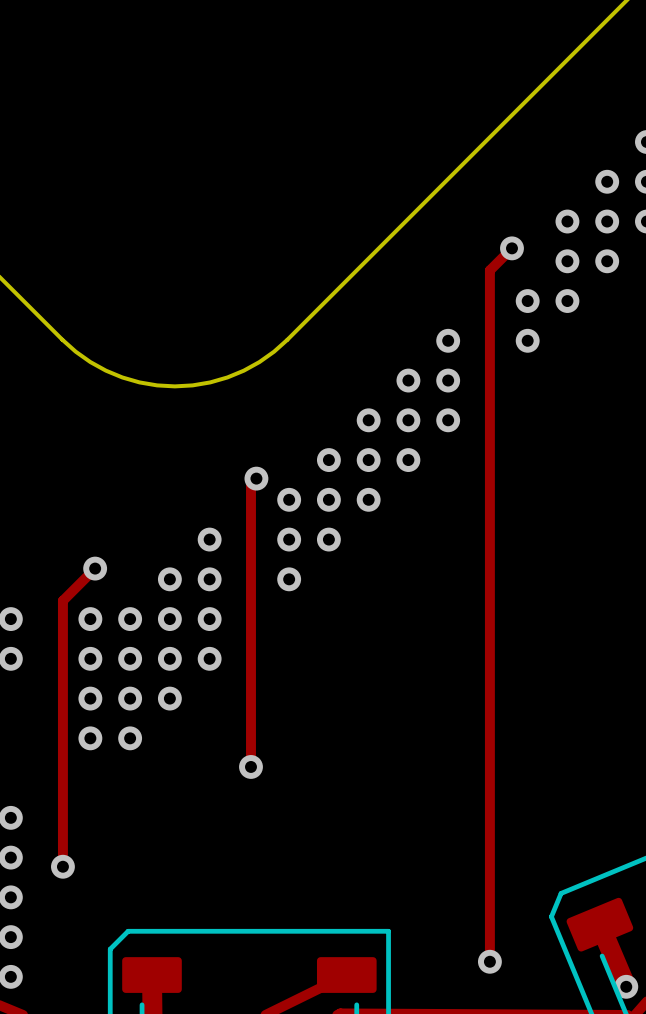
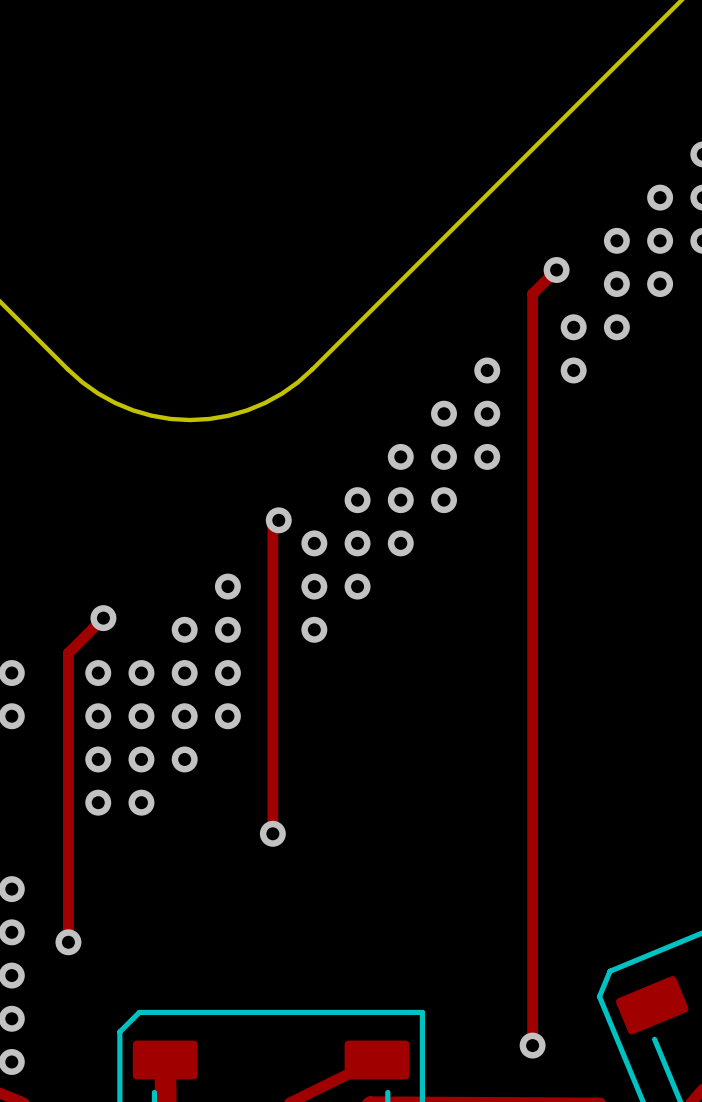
track: (599, 924) (626, 986) -> none
via: (626, 986) -> none

